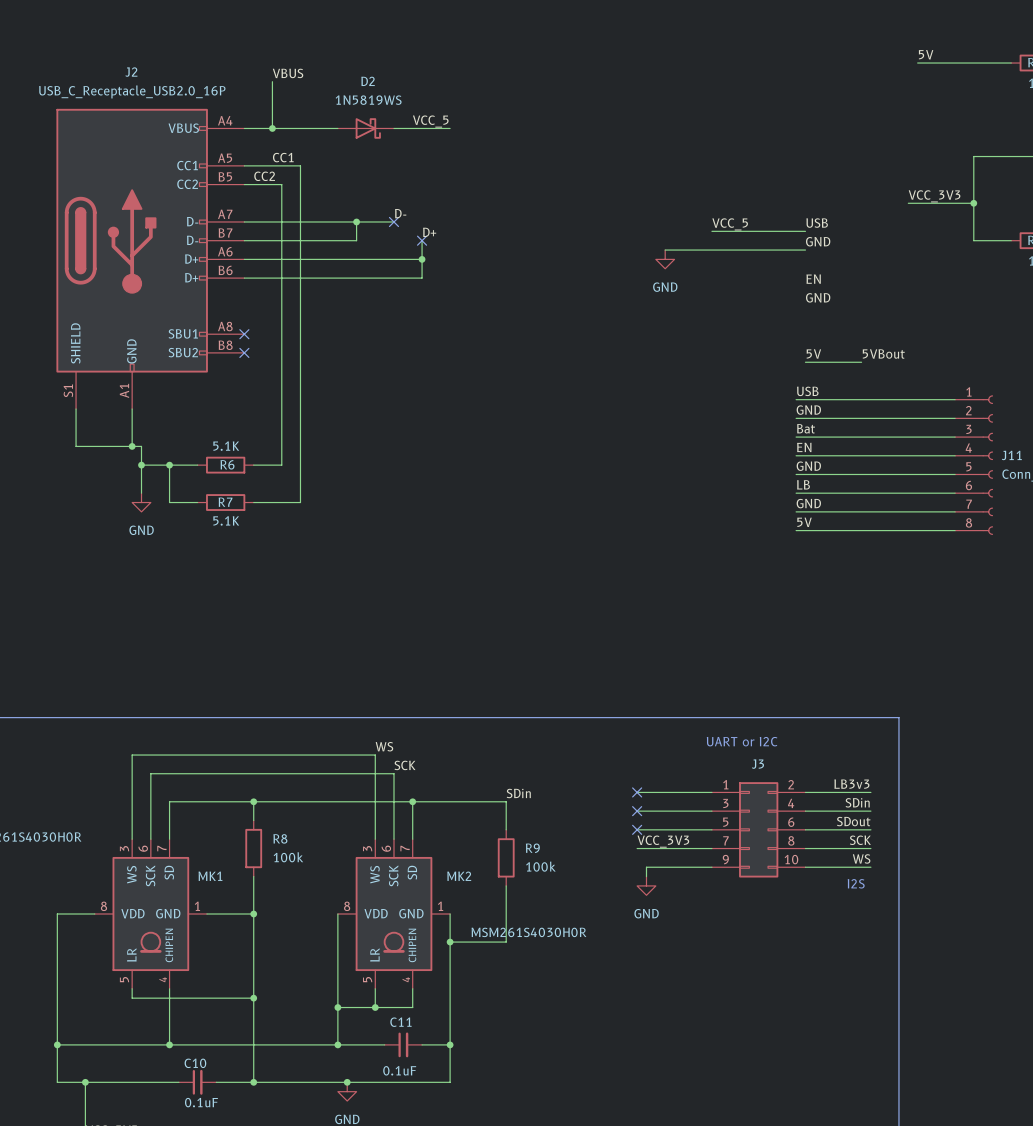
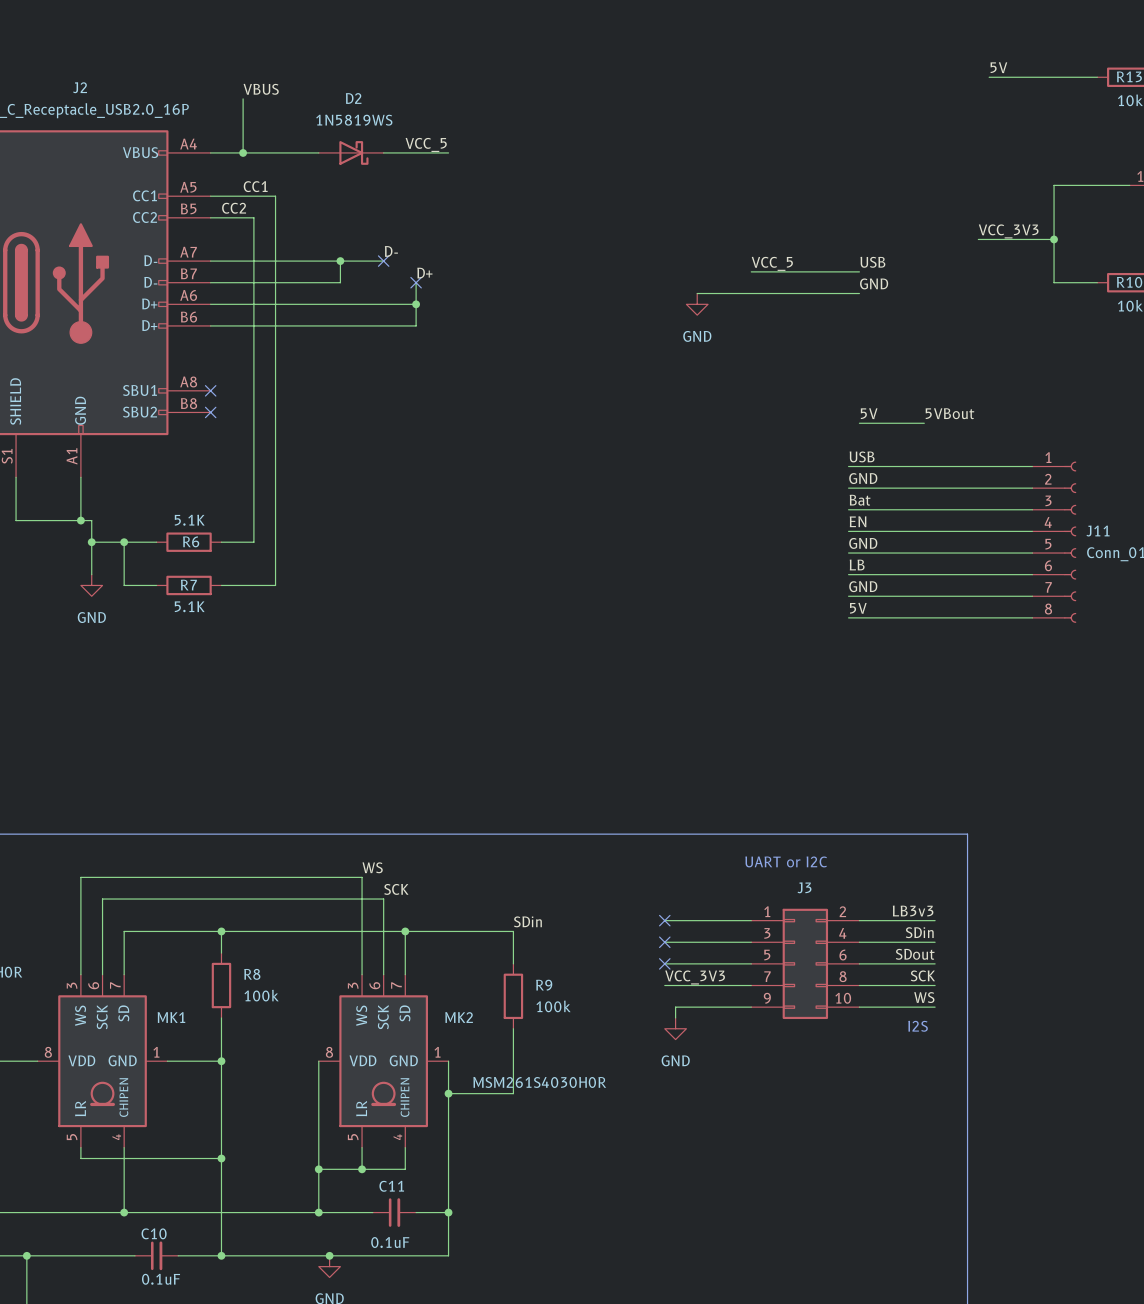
label: EN (813, 279) -> none
label: GND (818, 297) -> none

